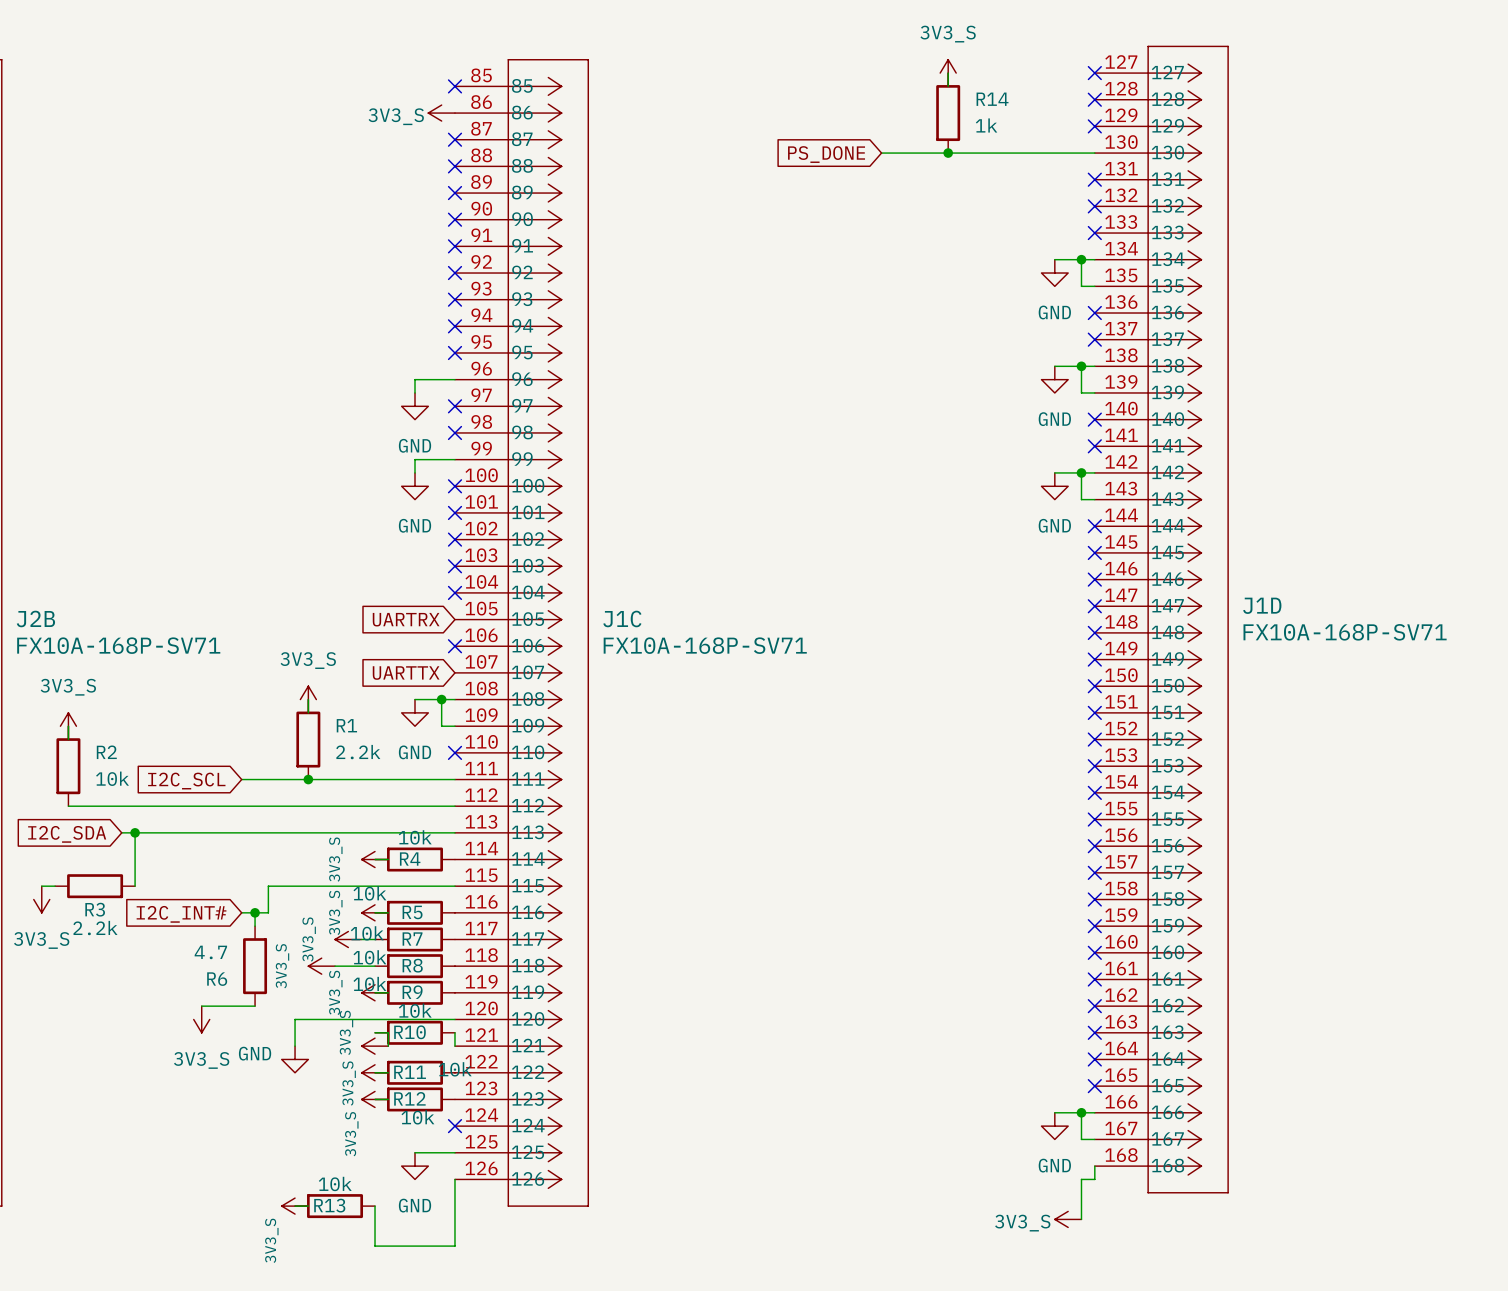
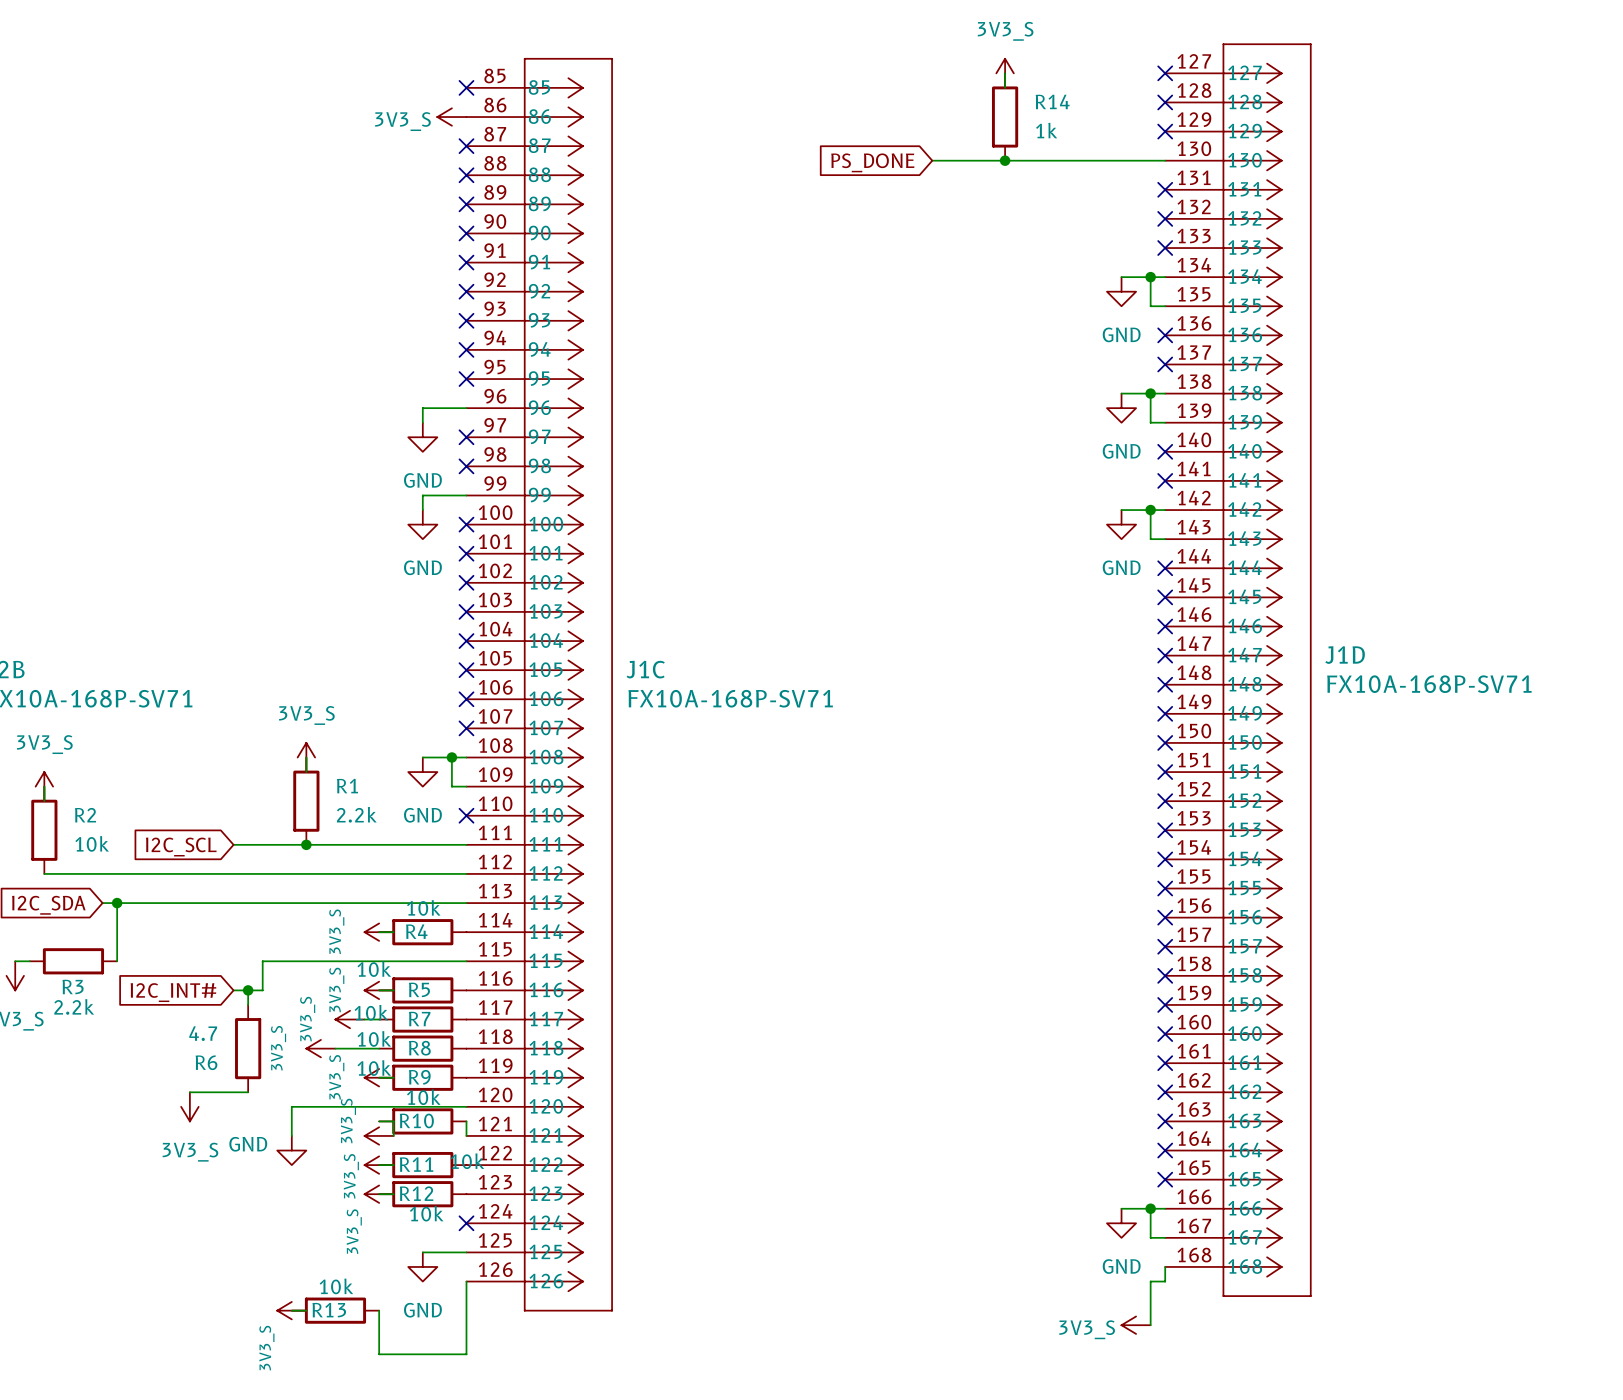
global label: UARTRX (406, 619) -> none
no-connect mark: none -> (466, 670)
no-connect mark: none -> (466, 728)
global label: UARTTX (406, 673) -> none

